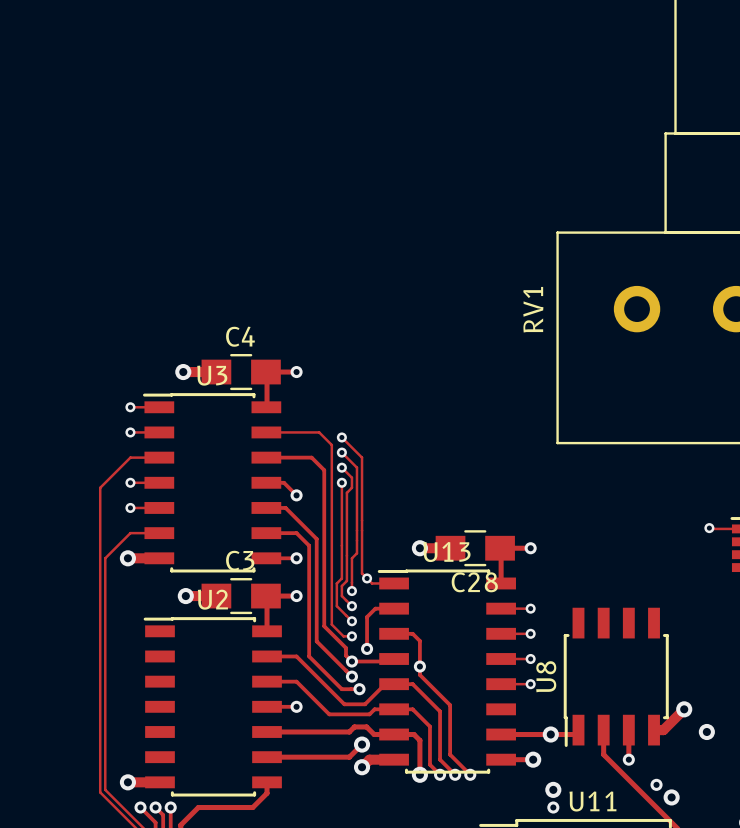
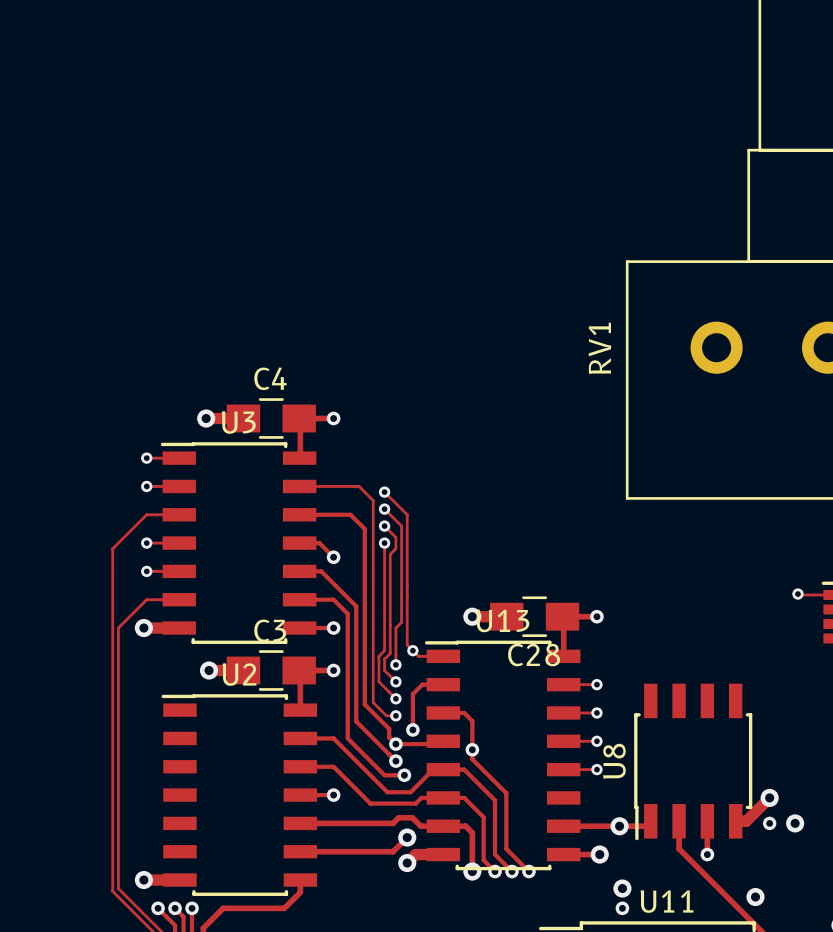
via position: (656, 784) -> (769, 823)

